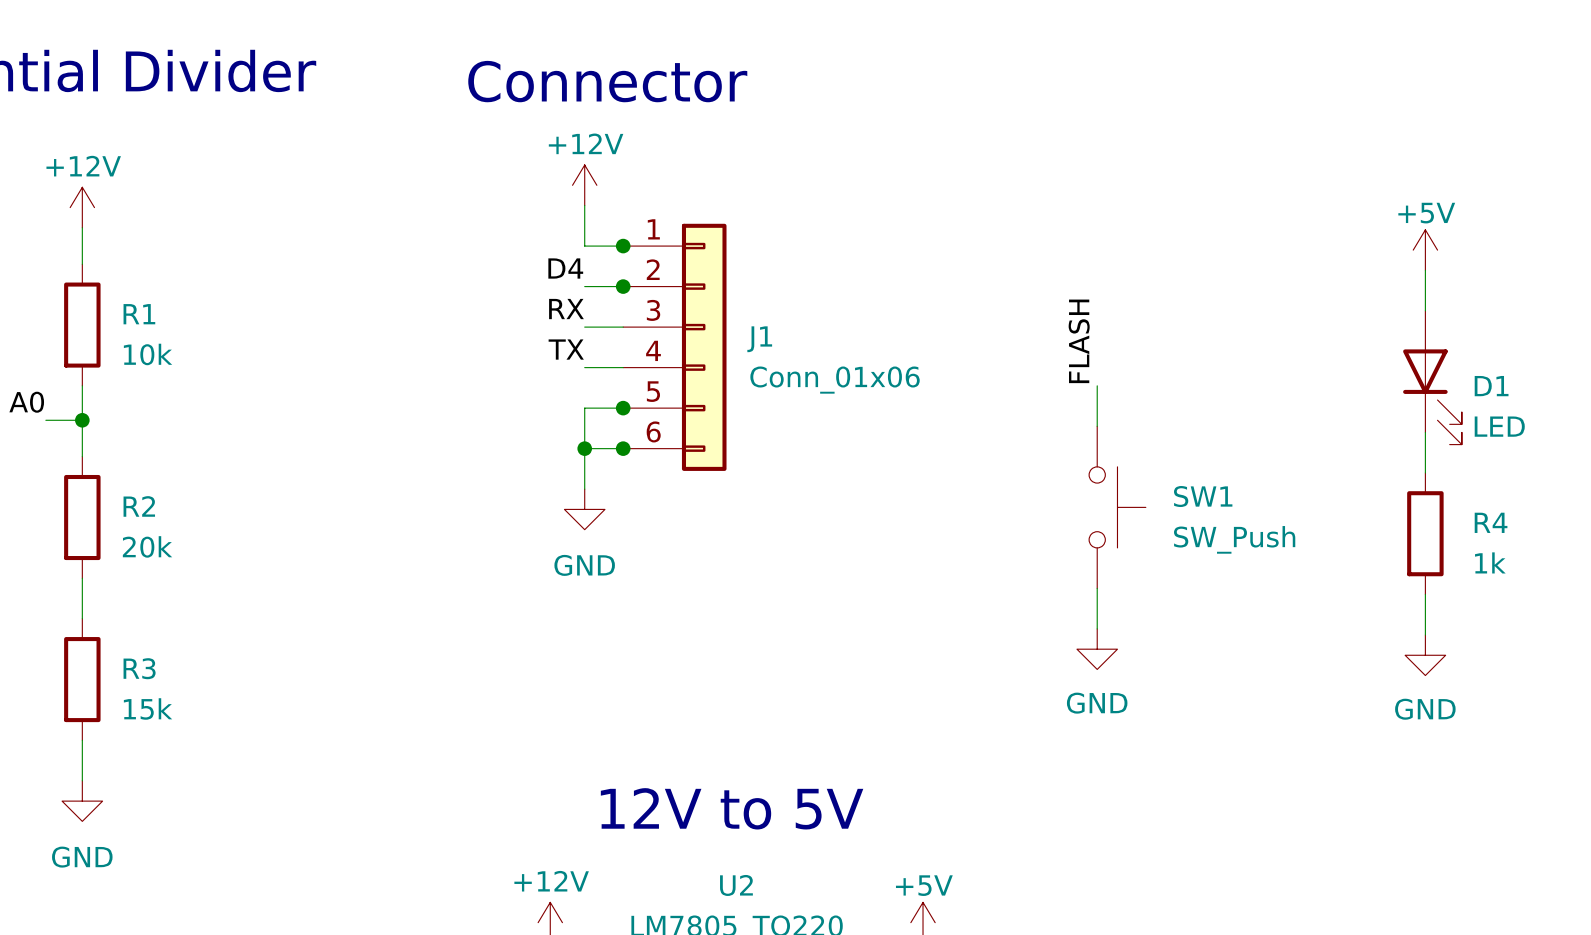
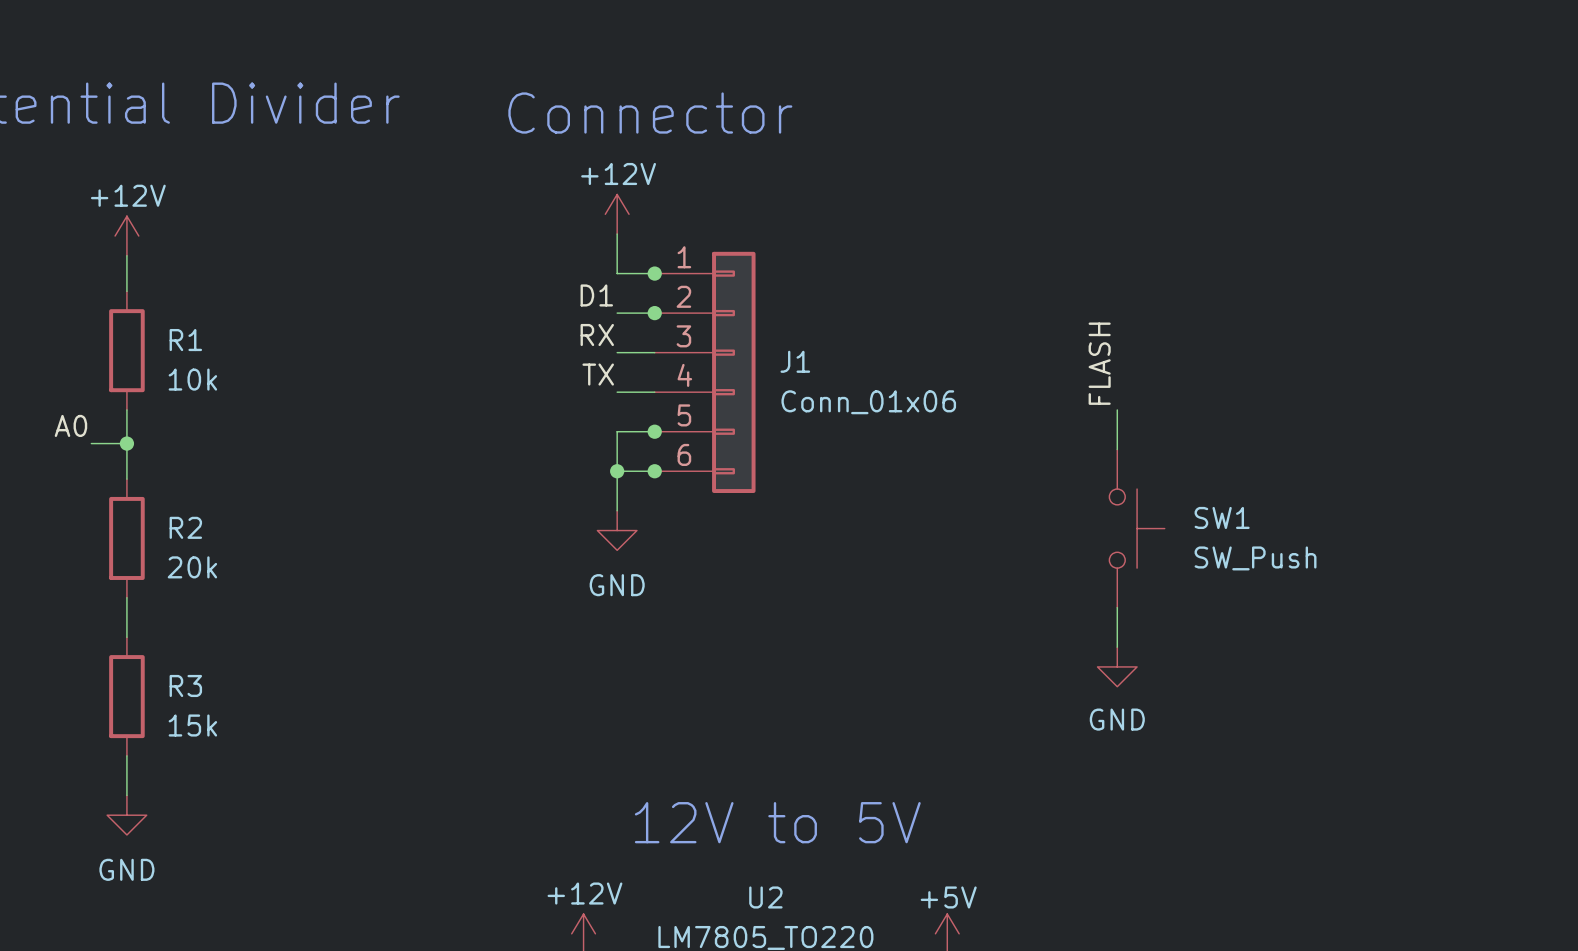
power symbol: +5V (1425, 250) -> none
label: D4 (565, 268) -> D1 (596, 295)
wire: (1425, 270) (1425, 310) -> none
D1: LED (1432, 377) -> none
wire: (1425, 432) (1425, 472) -> none
R4: 1k (1425, 533) -> none
wire: (1425, 594) (1425, 635) -> none
power symbol: GND (1425, 655) -> none

